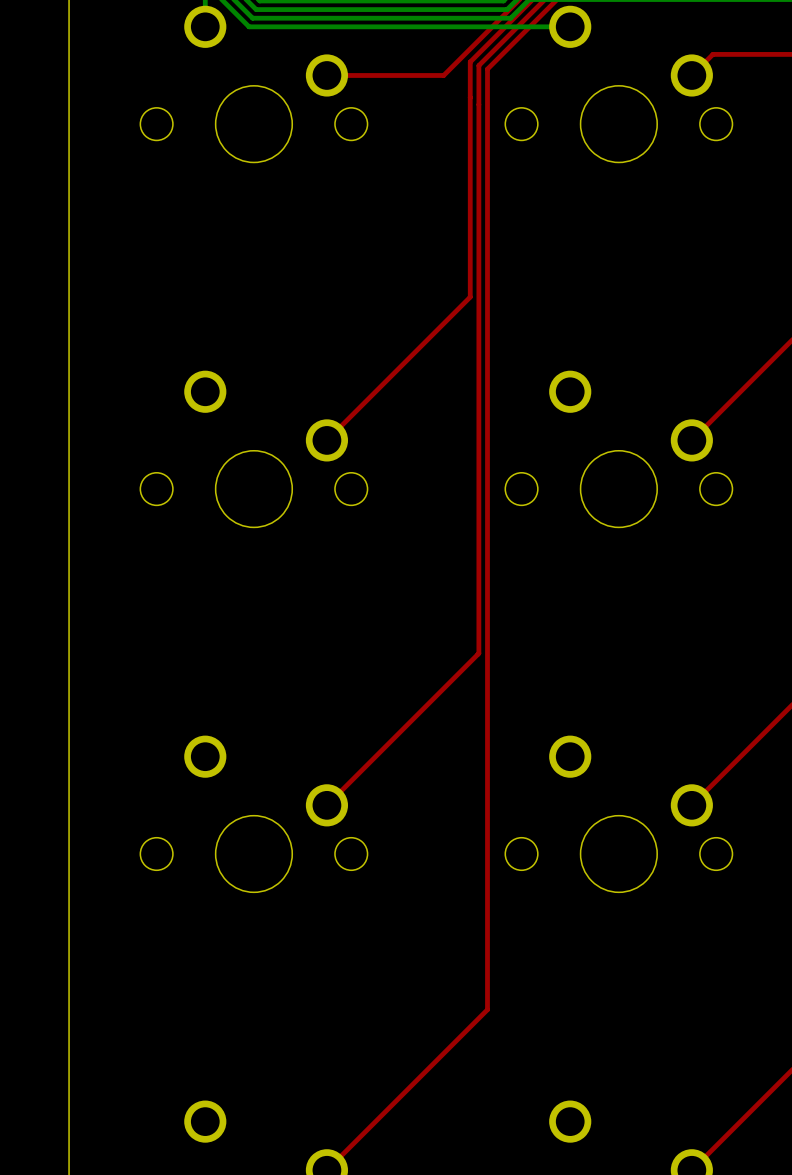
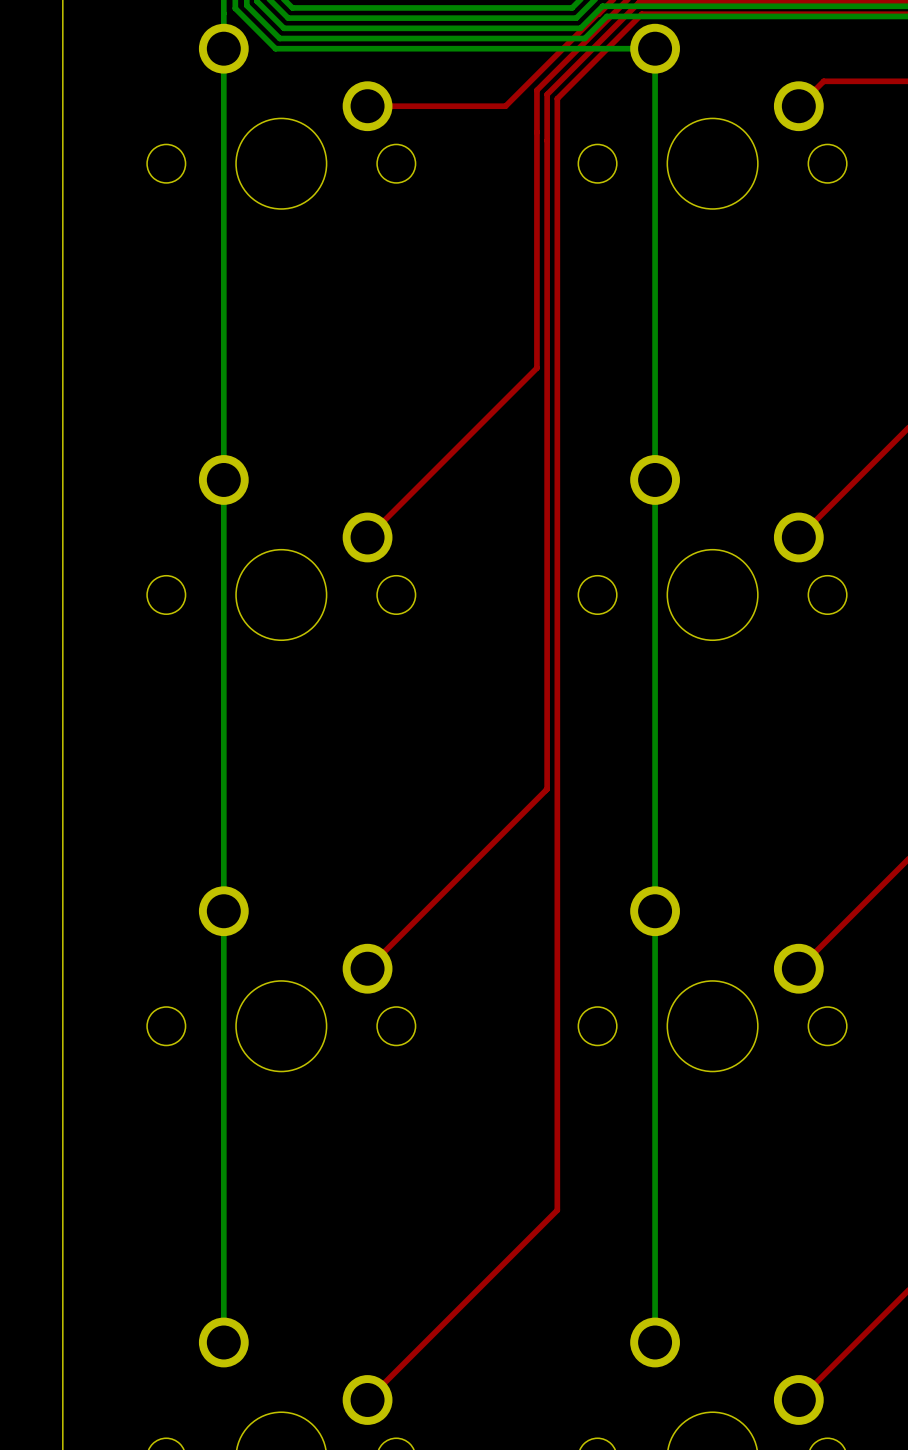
bottom track: none -> (223, 48) (223, 1342)
bottom track: none -> (655, 48) (655, 1342)

